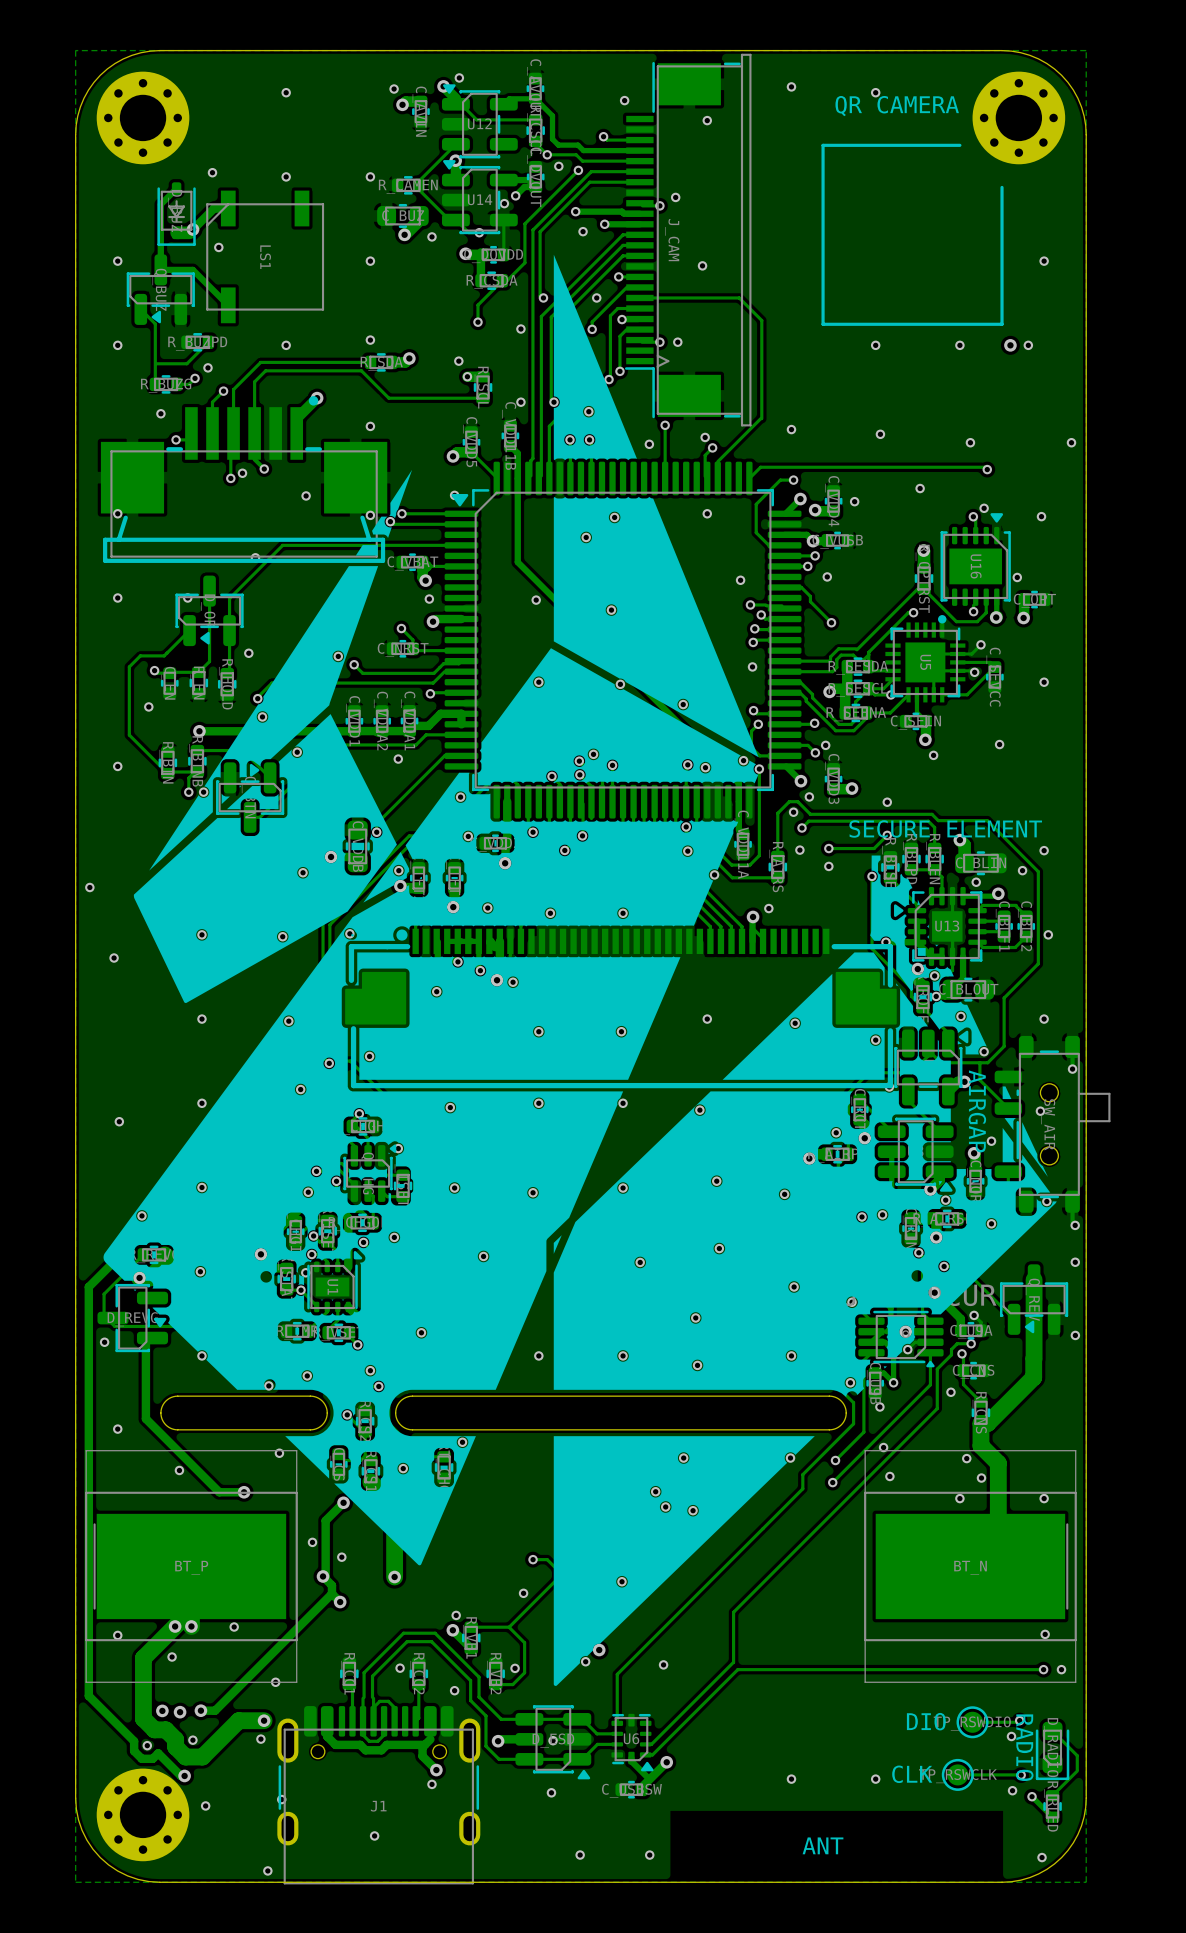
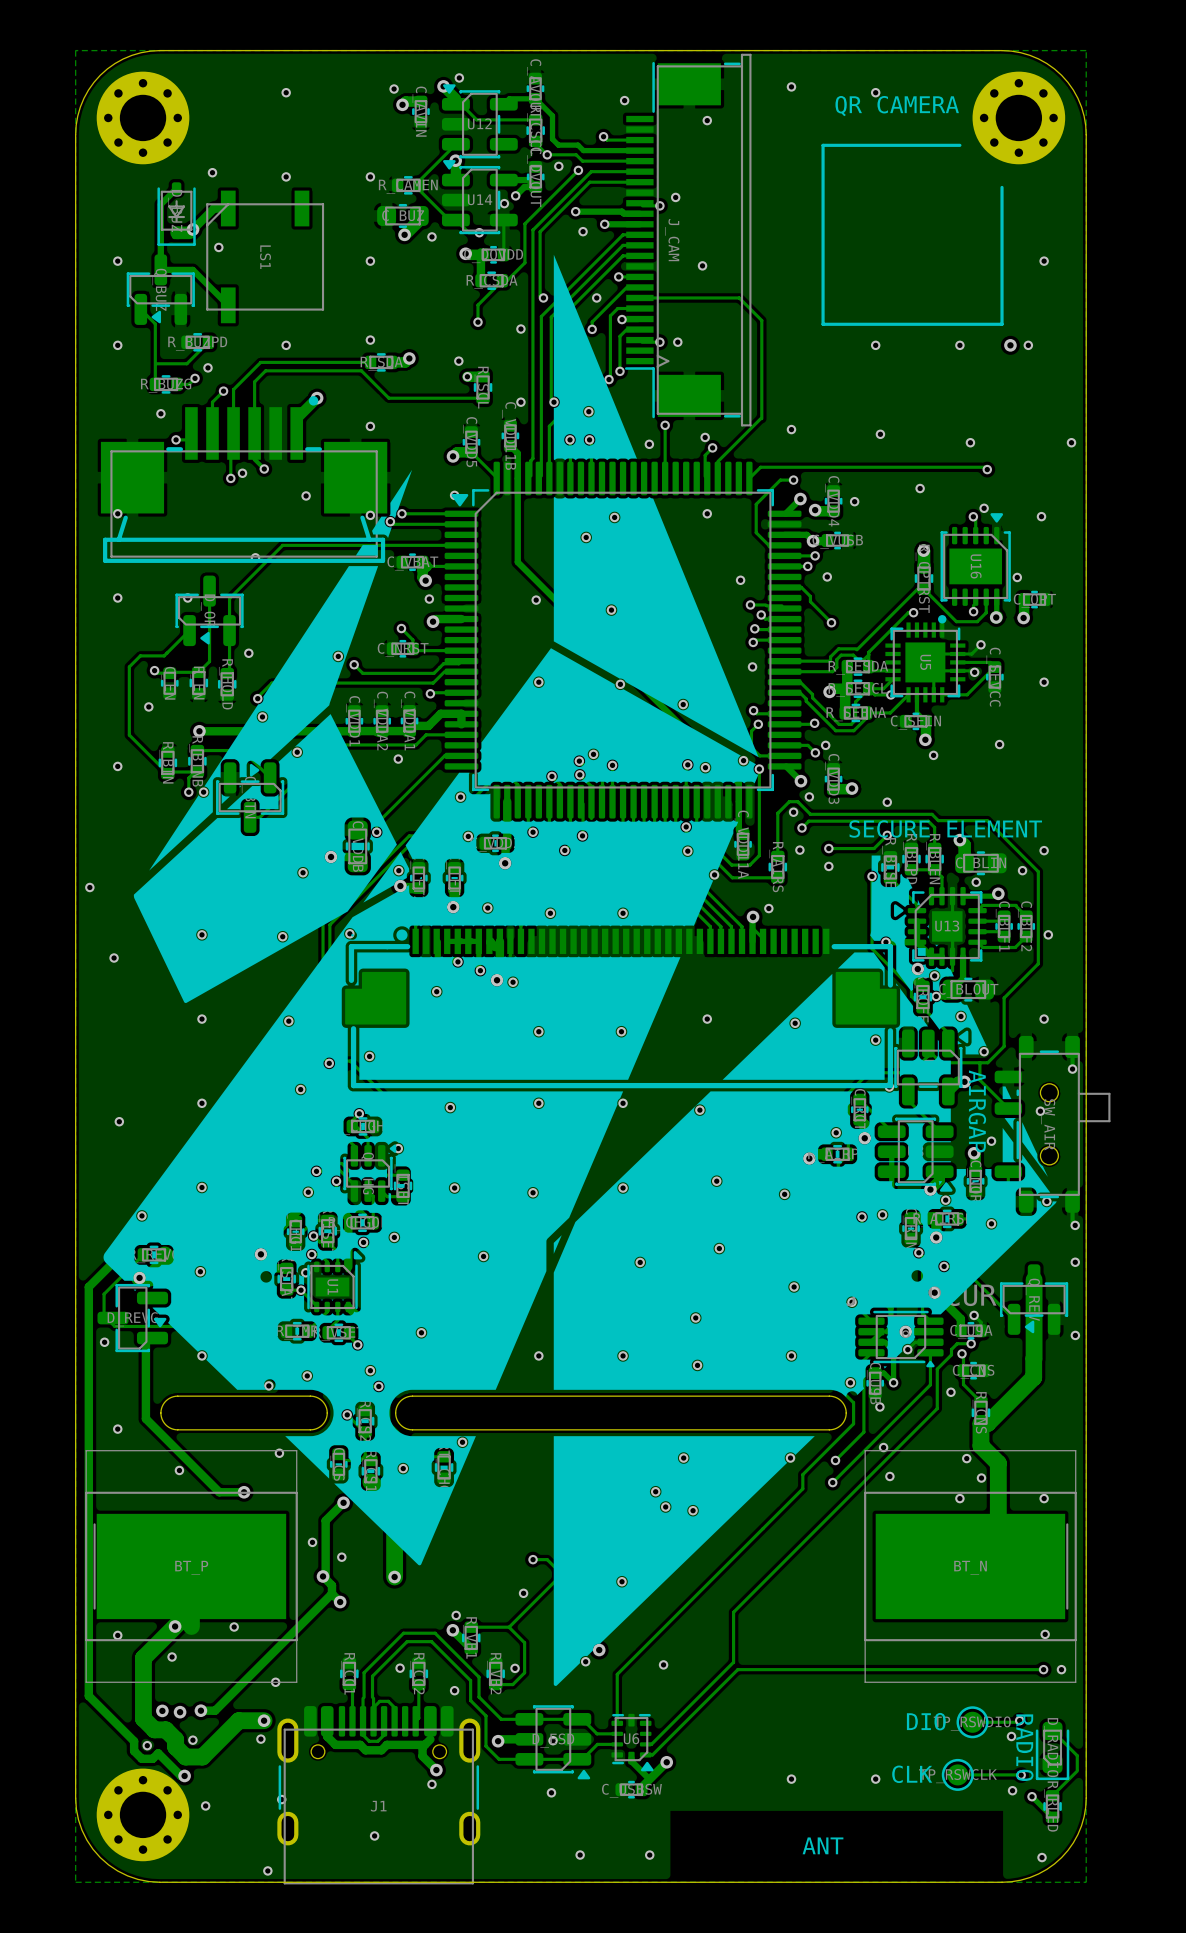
via: (191, 1626) -> none

